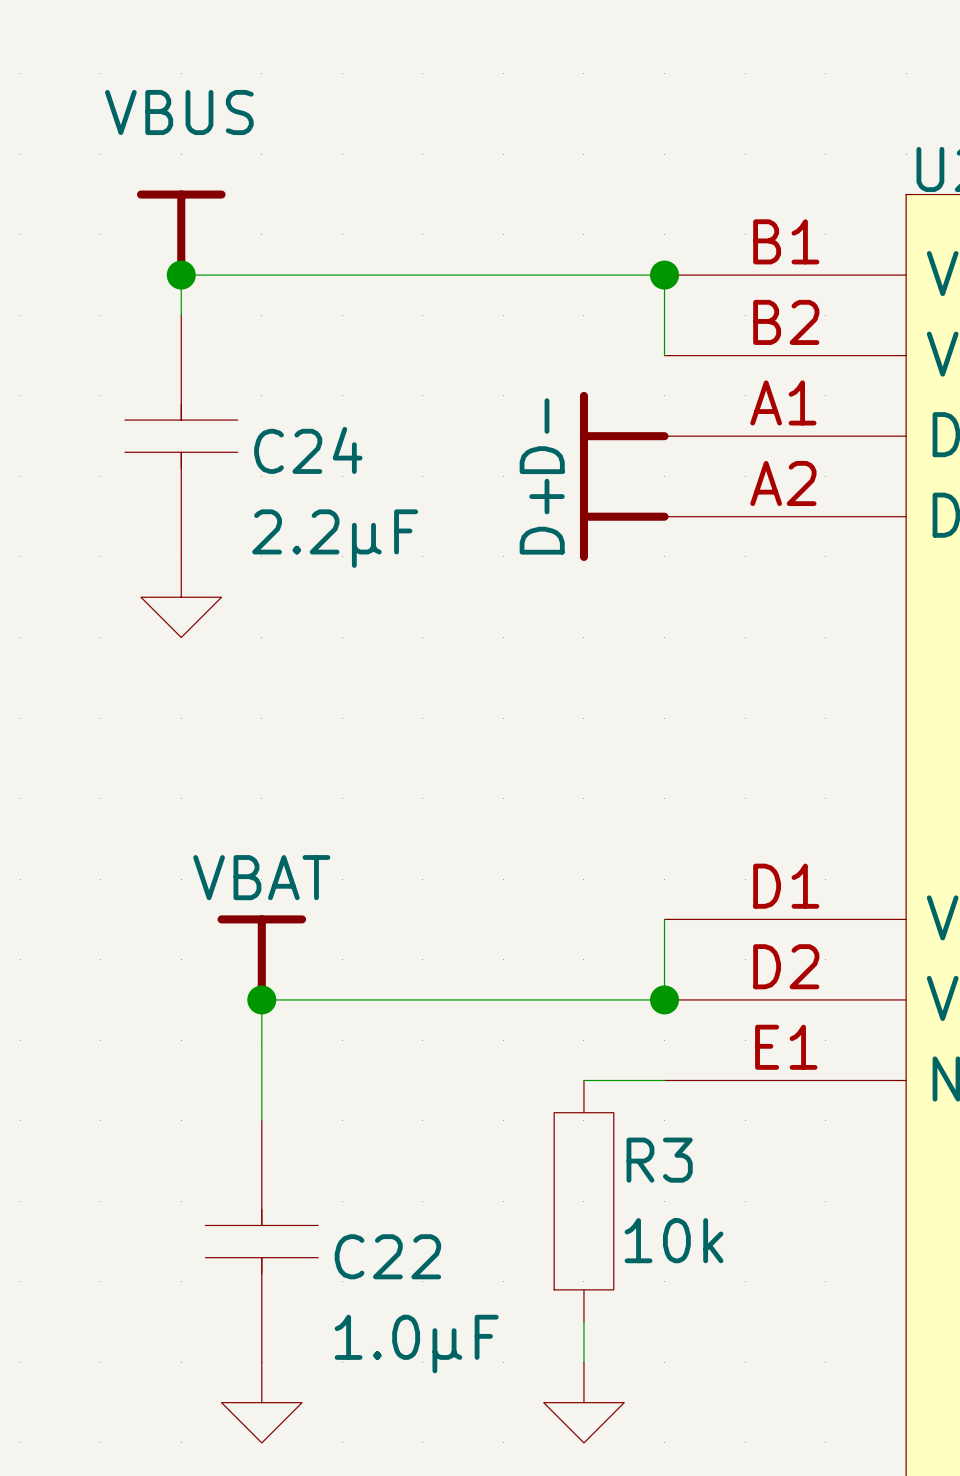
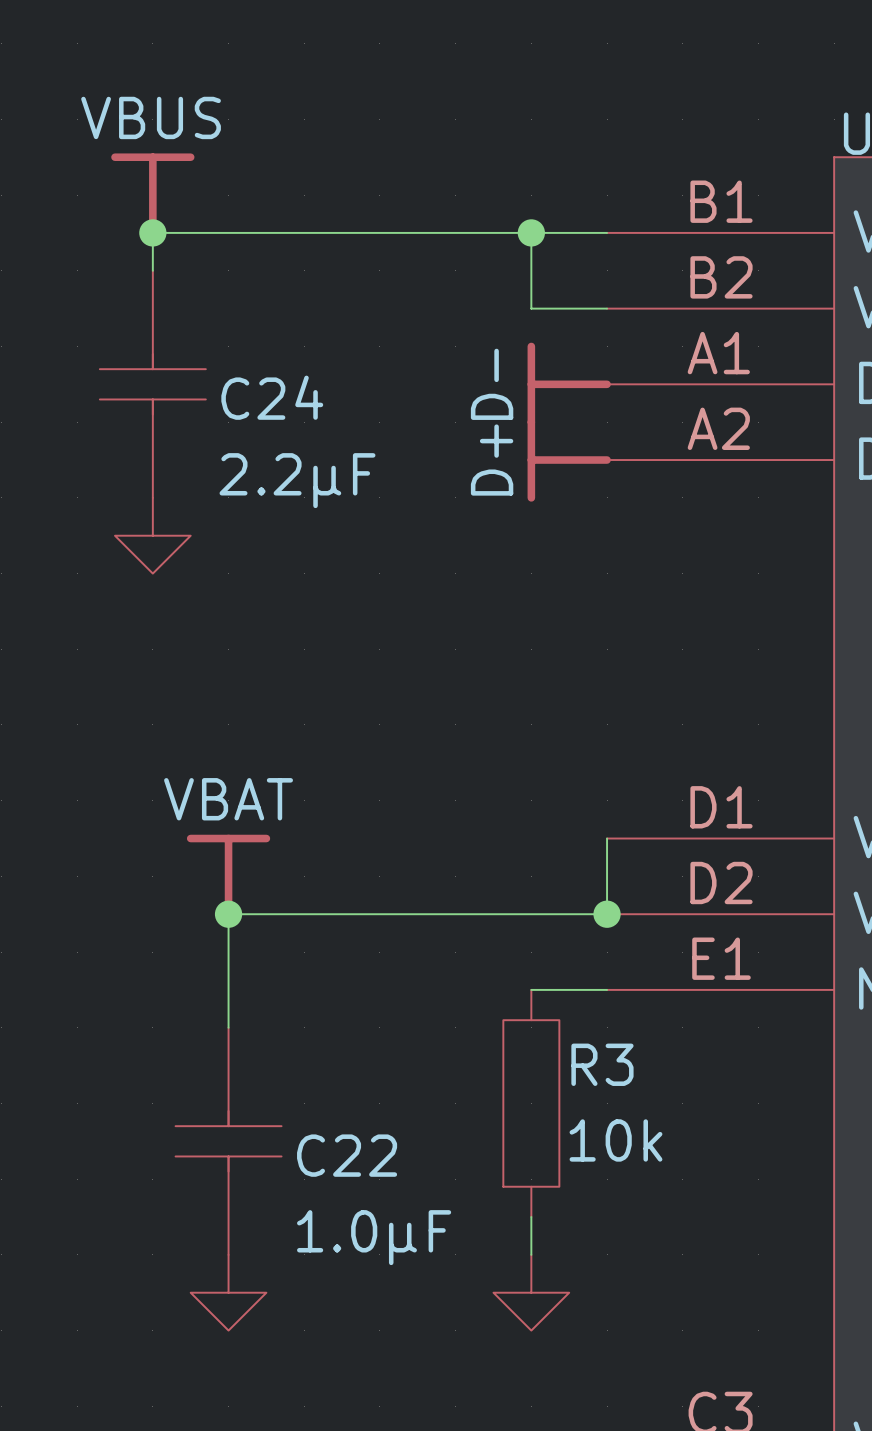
power symbol text position: VBUS (179, 112) -> VBUS (151, 117)
wire: (664, 275) (664, 355) -> (531, 232) (531, 308) (607, 308)
junction position: (664, 275) -> (531, 232)

